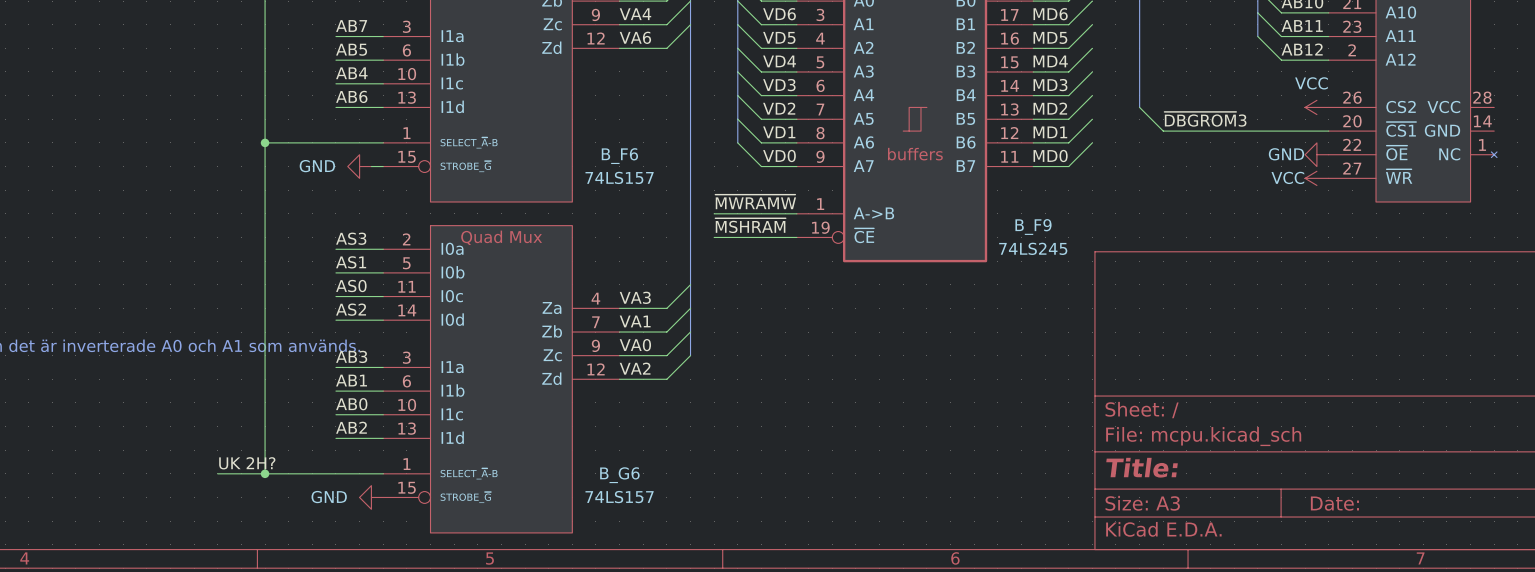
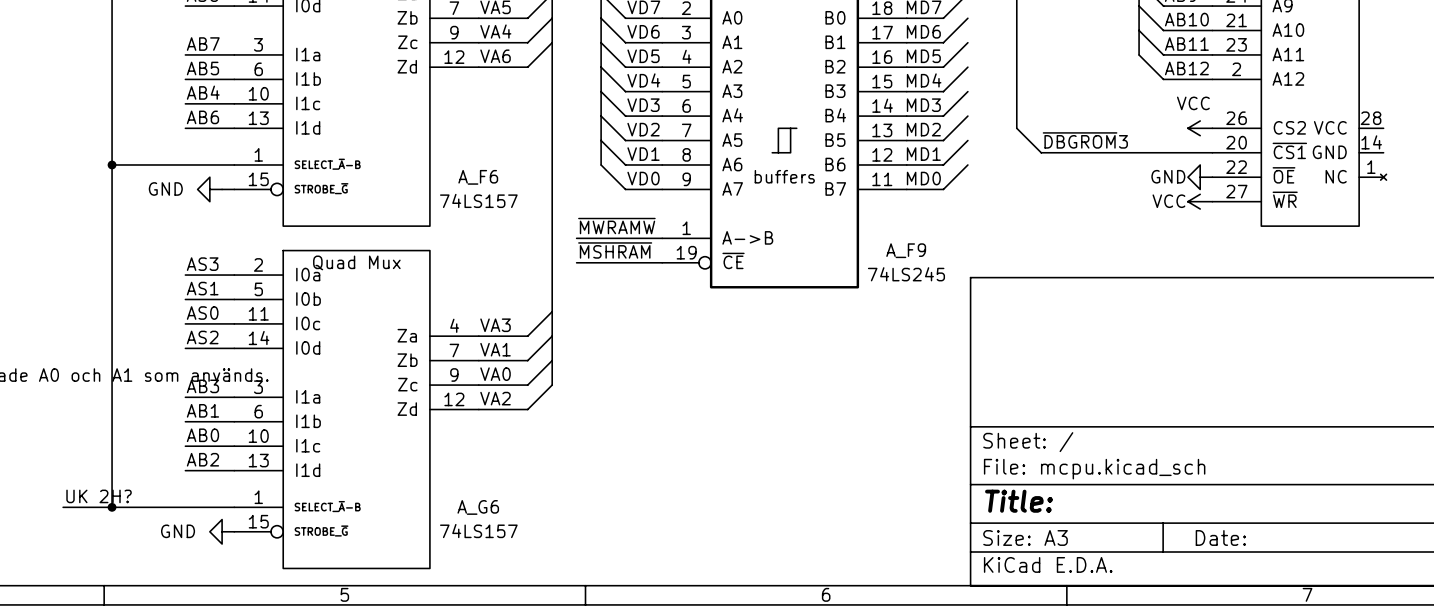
B_F6 name: B_F6 (619, 156) -> A_F6 (478, 177)
B_F9 name: B_F9 (1033, 227) -> A_F9 (906, 250)
B_G6 name: B_G6 (619, 475) -> A_G6 (478, 507)

